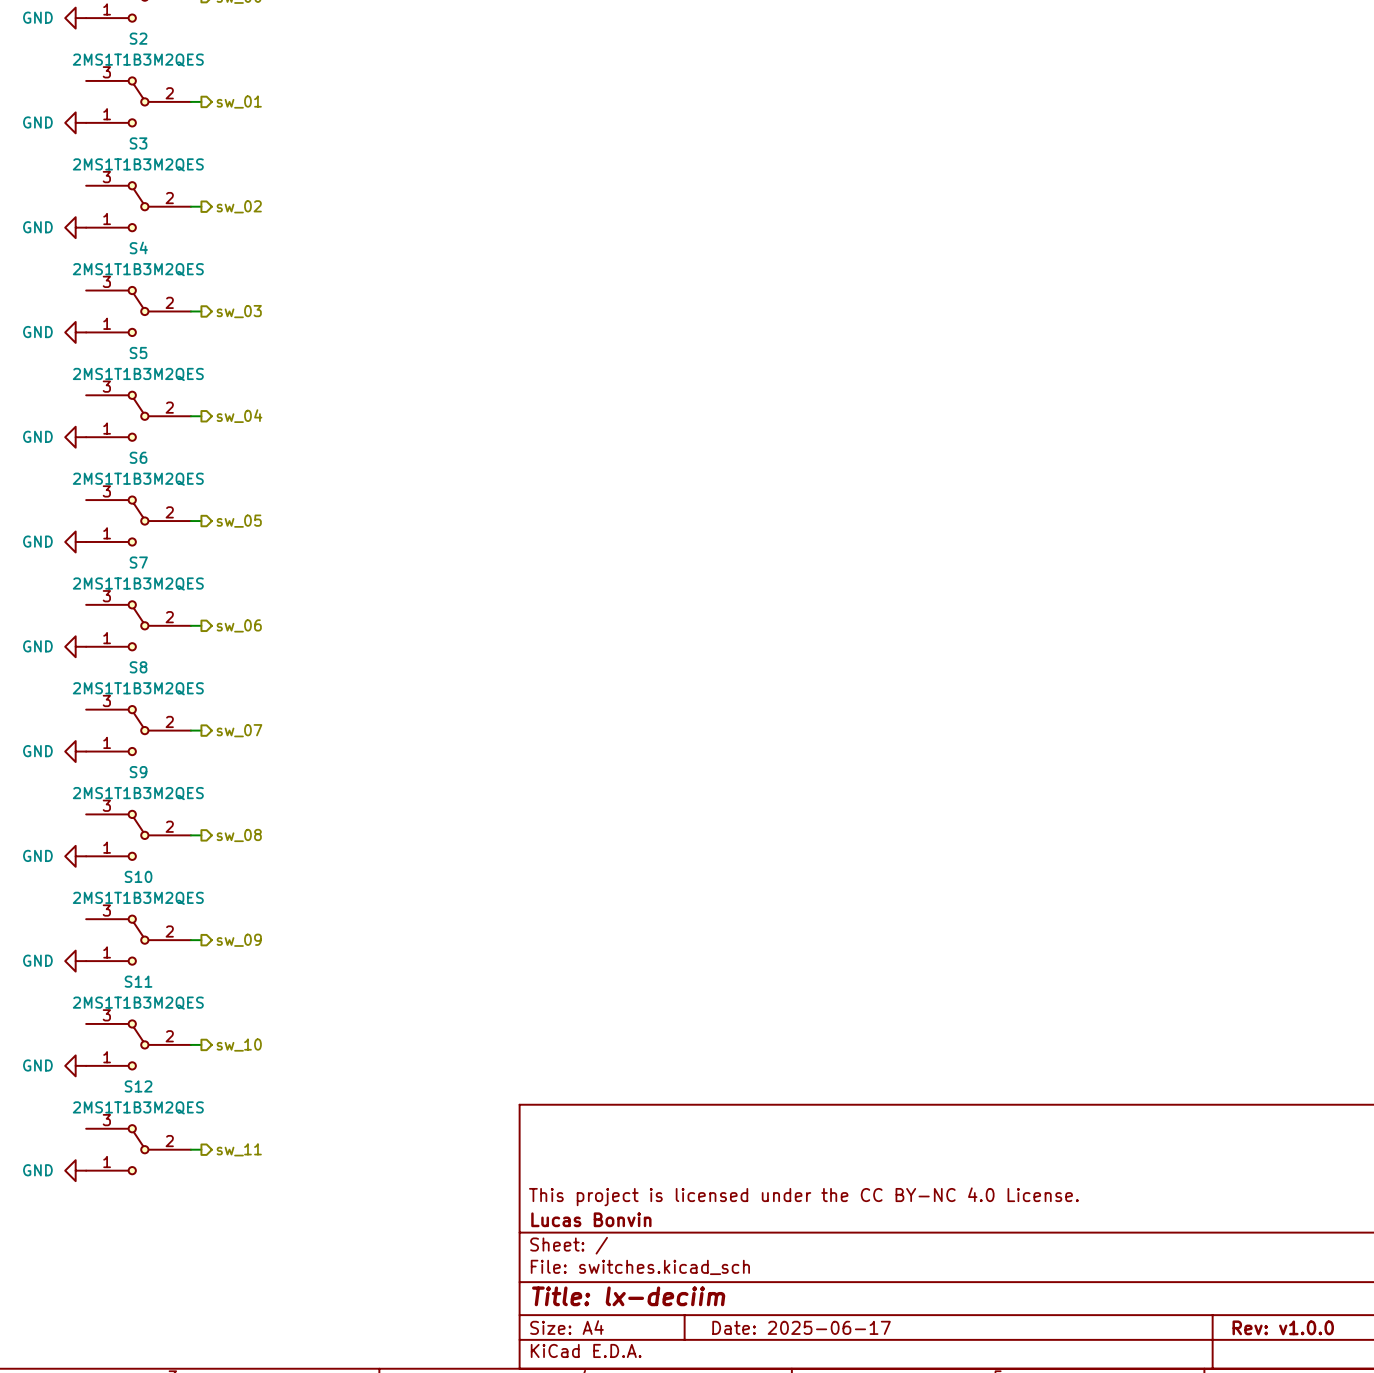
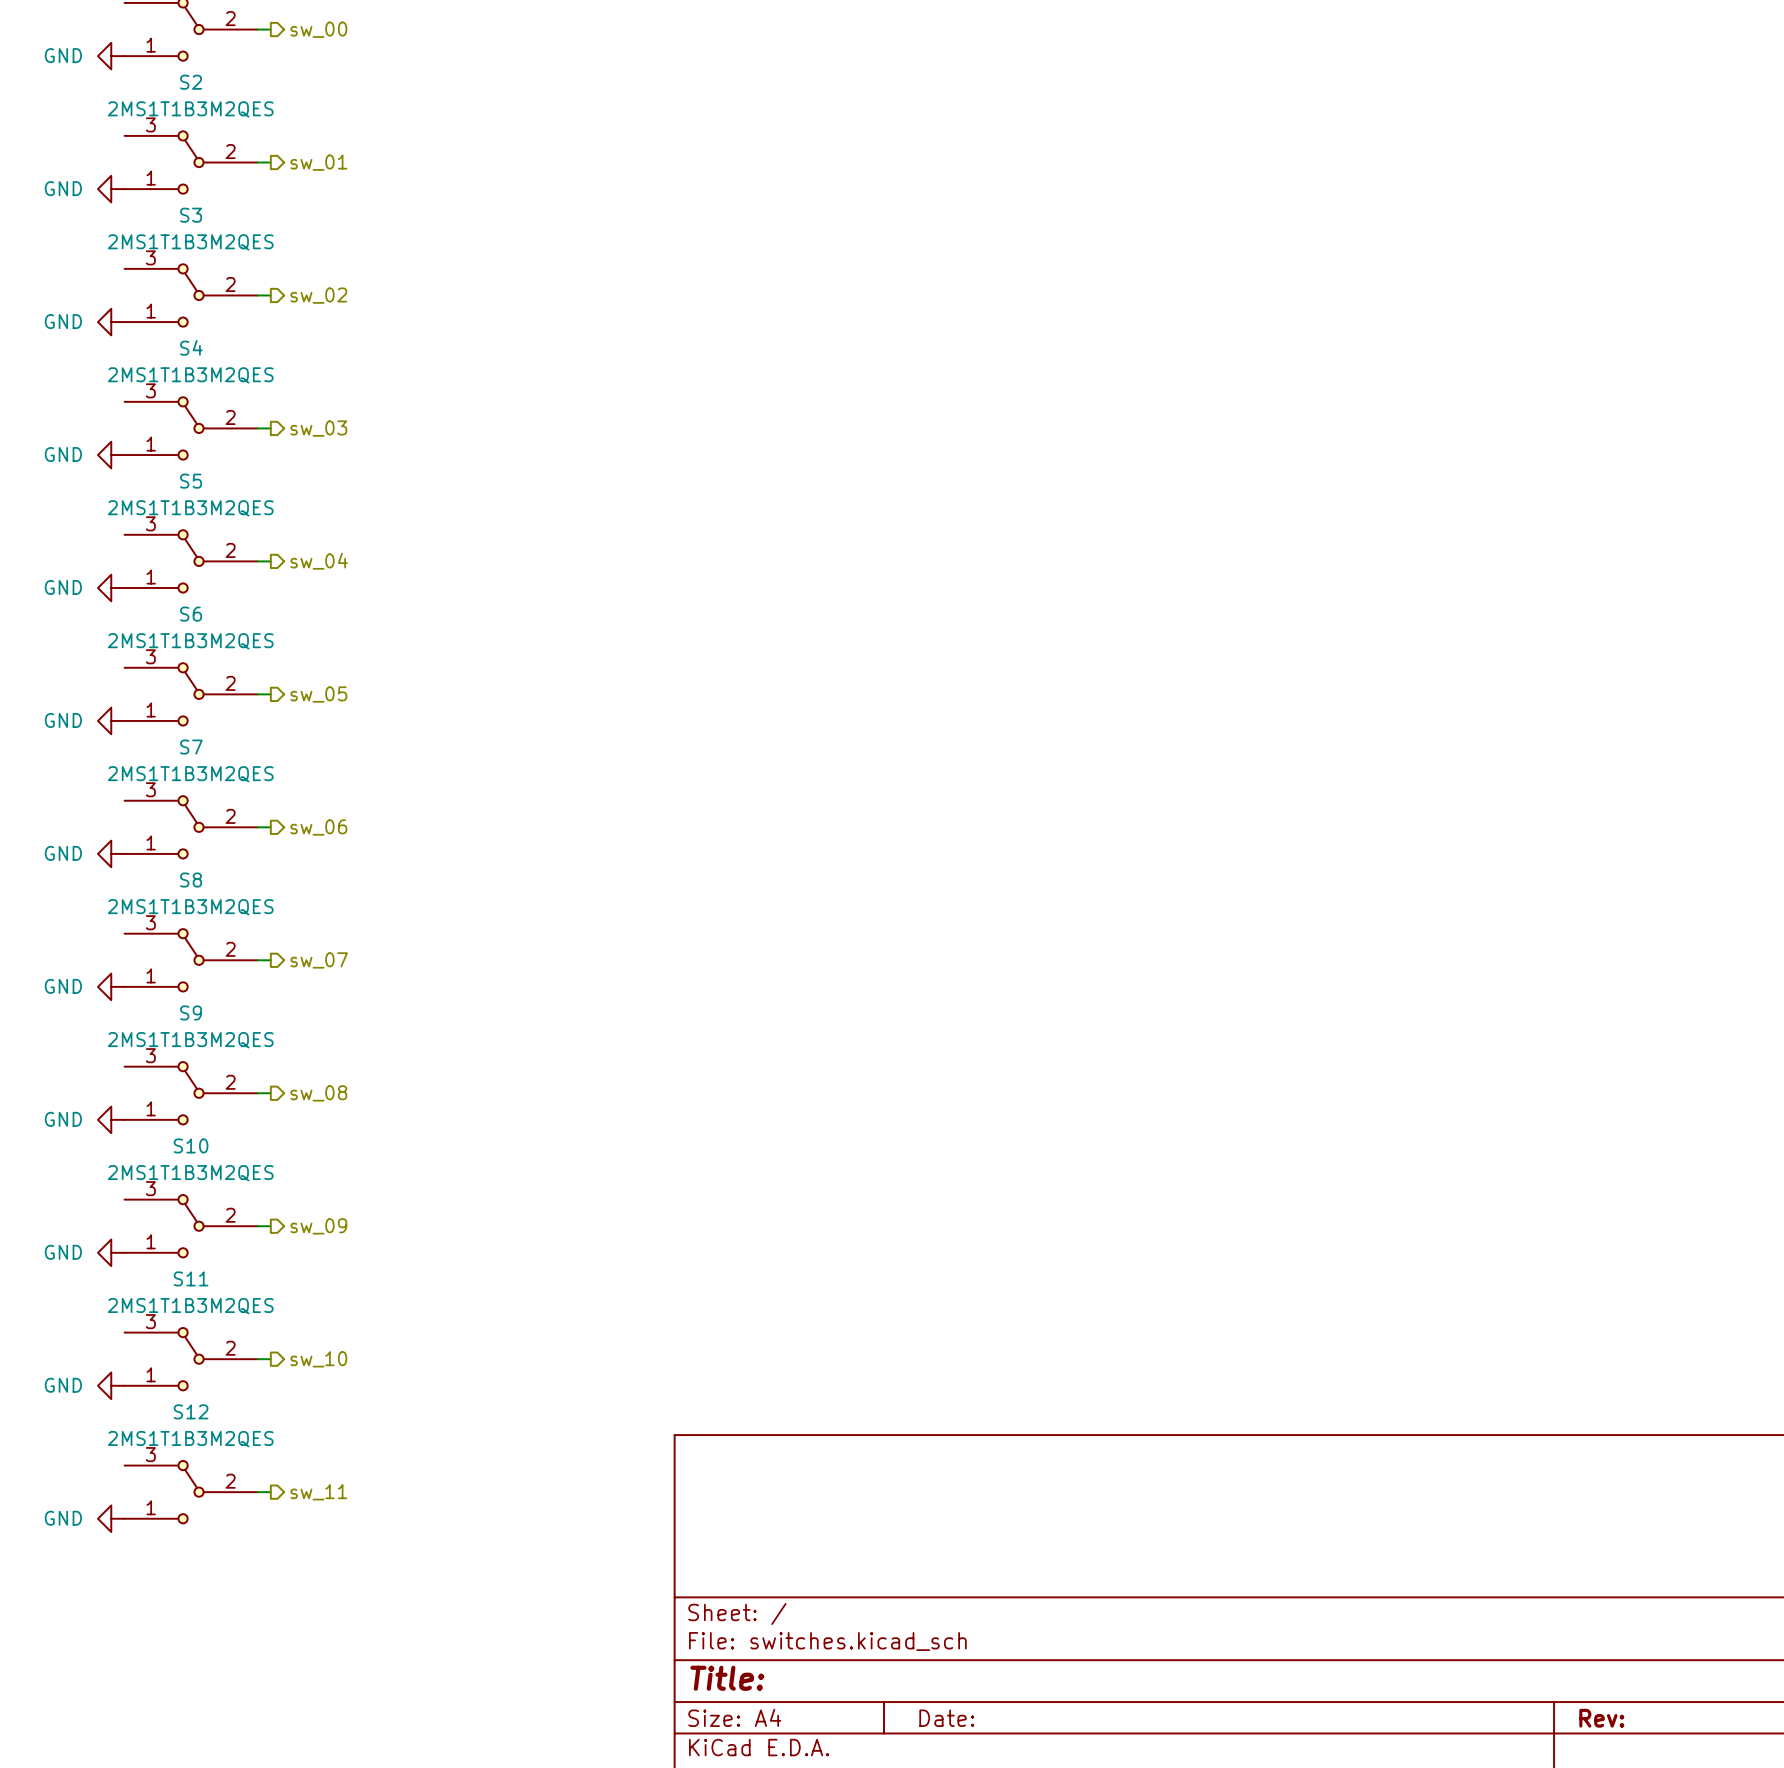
title block: This project is licensed under the CC BY-NC 4.0 License. (803, 1196) -> none
title block: Lucas Bonvin (591, 1219) -> none
title block: Title: lx-deciim (628, 1296) -> Title: (727, 1678)
title block: Date: 2025-06-17 (801, 1327) -> Date: (946, 1718)
title block: Rev: v1.0.0 (1283, 1327) -> Rev: (1601, 1718)

